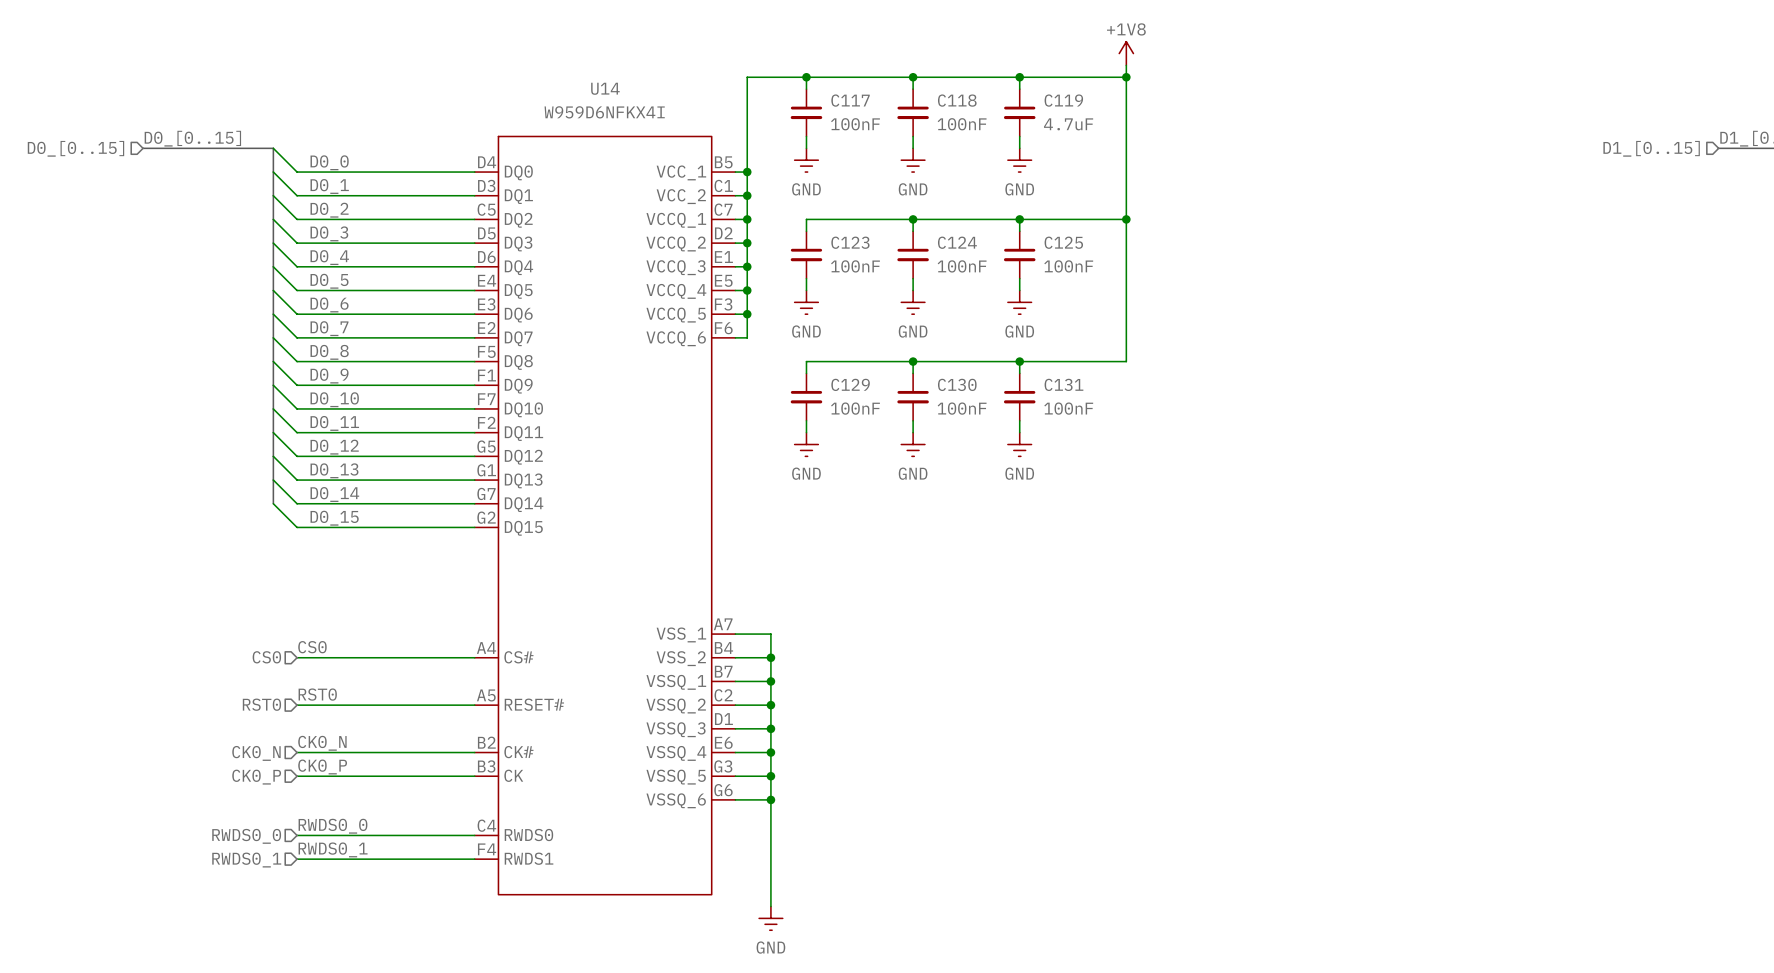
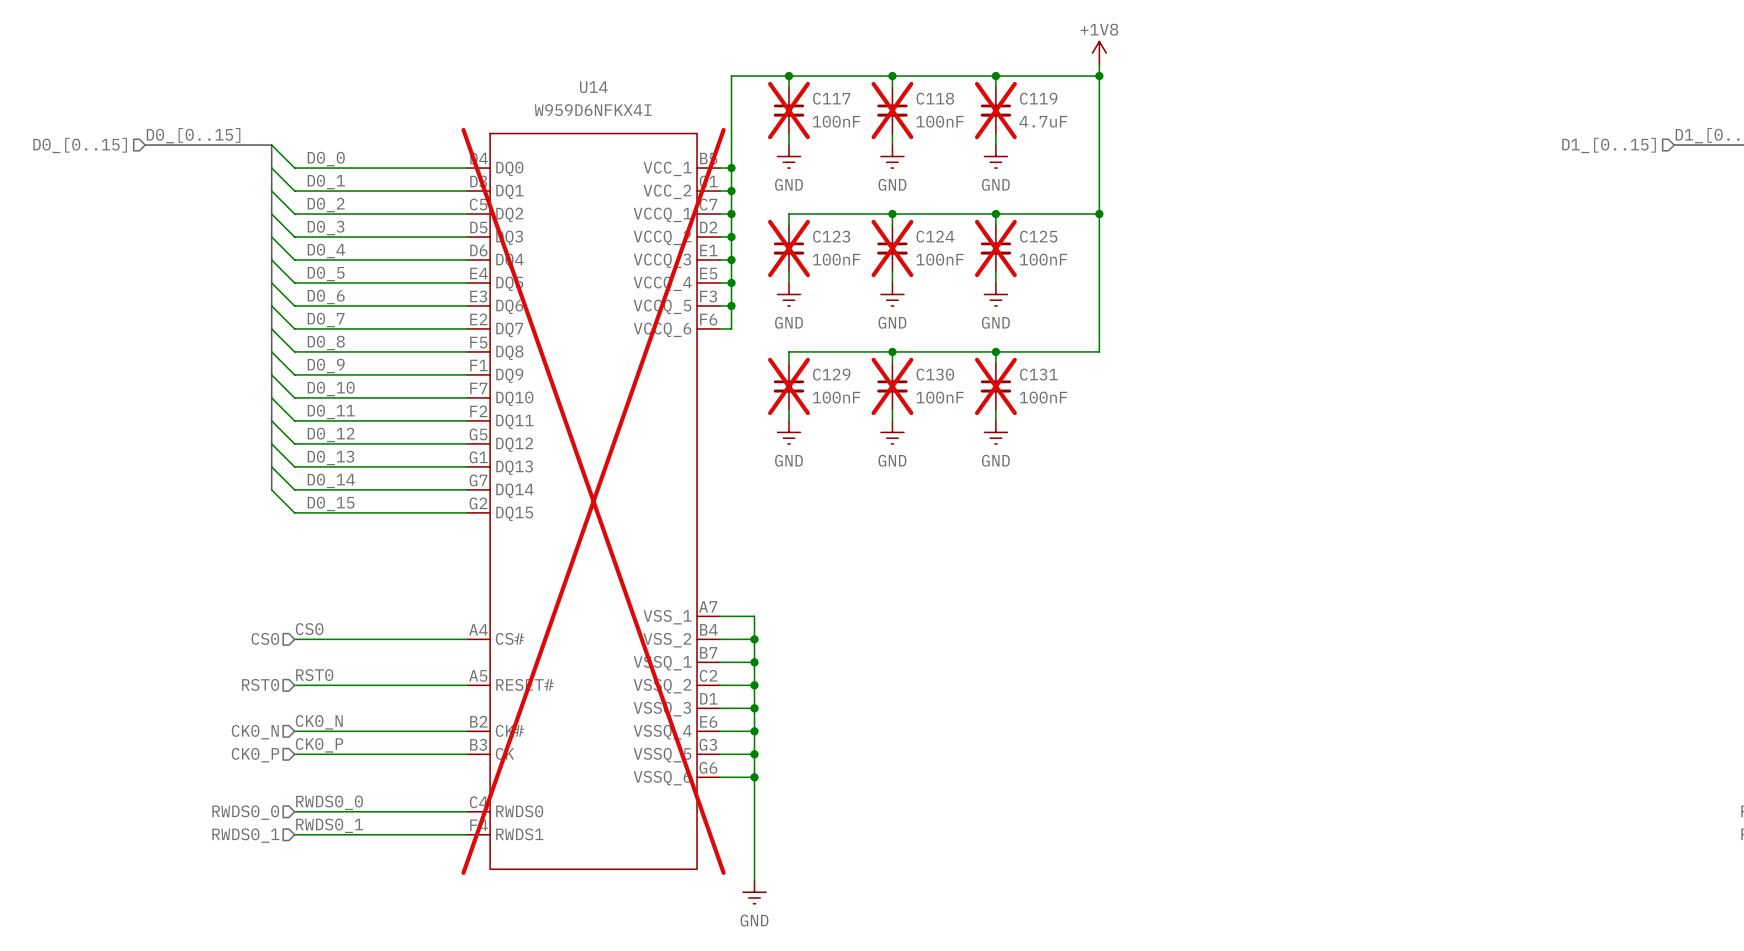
C117 do-not-place cross: none -> (788, 110)
C118 do-not-place cross: none -> (892, 110)
C119 do-not-place cross: none -> (995, 110)
C123 do-not-place cross: none -> (788, 248)
C124 do-not-place cross: none -> (892, 248)
C125 do-not-place cross: none -> (995, 248)
C129 do-not-place cross: none -> (788, 386)
C130 do-not-place cross: none -> (892, 386)
C131 do-not-place cross: none -> (995, 386)
U14 do-not-place cross: none -> (593, 501)

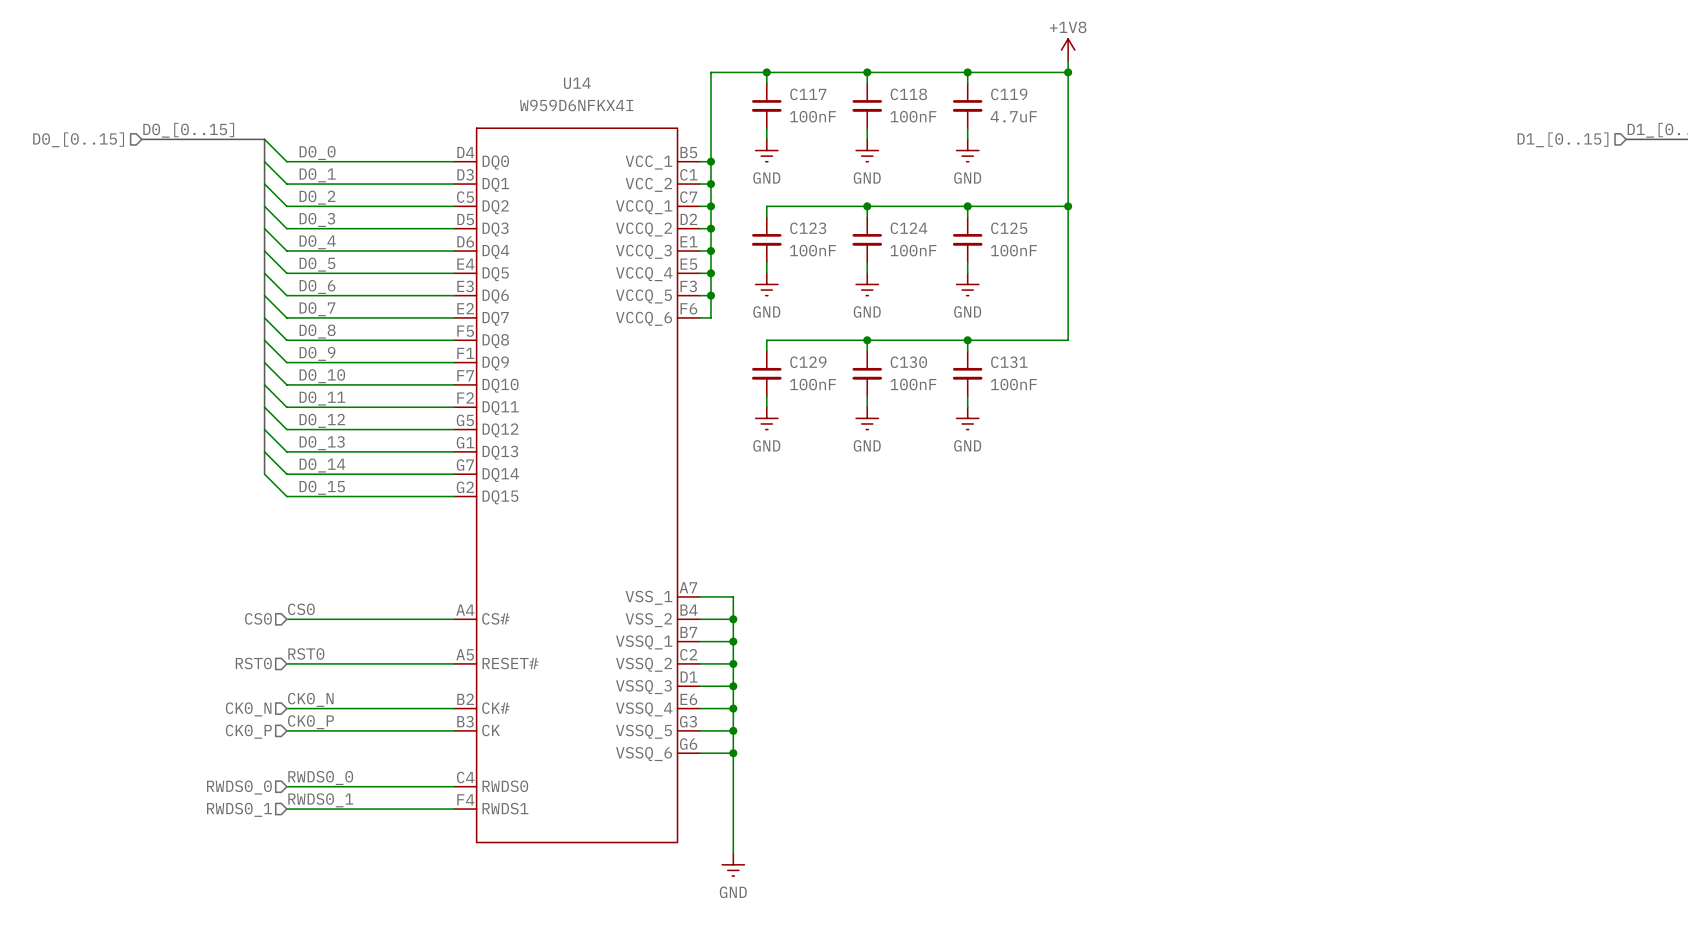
C117 do-not-place cross: (788, 110) -> none
C118 do-not-place cross: (892, 110) -> none
C119 do-not-place cross: (995, 110) -> none
C123 do-not-place cross: (788, 248) -> none
C124 do-not-place cross: (892, 248) -> none
C125 do-not-place cross: (995, 248) -> none
C129 do-not-place cross: (788, 386) -> none
C130 do-not-place cross: (892, 386) -> none
C131 do-not-place cross: (995, 386) -> none
U14 do-not-place cross: (593, 501) -> none

